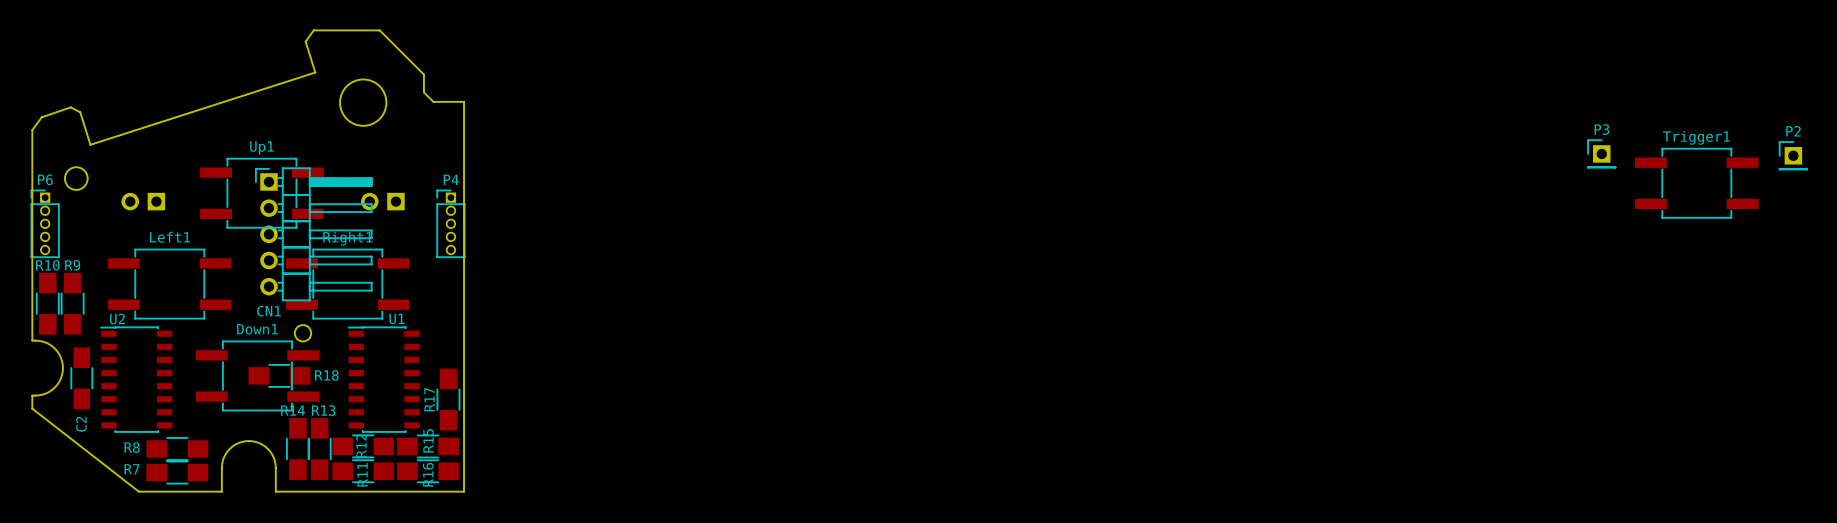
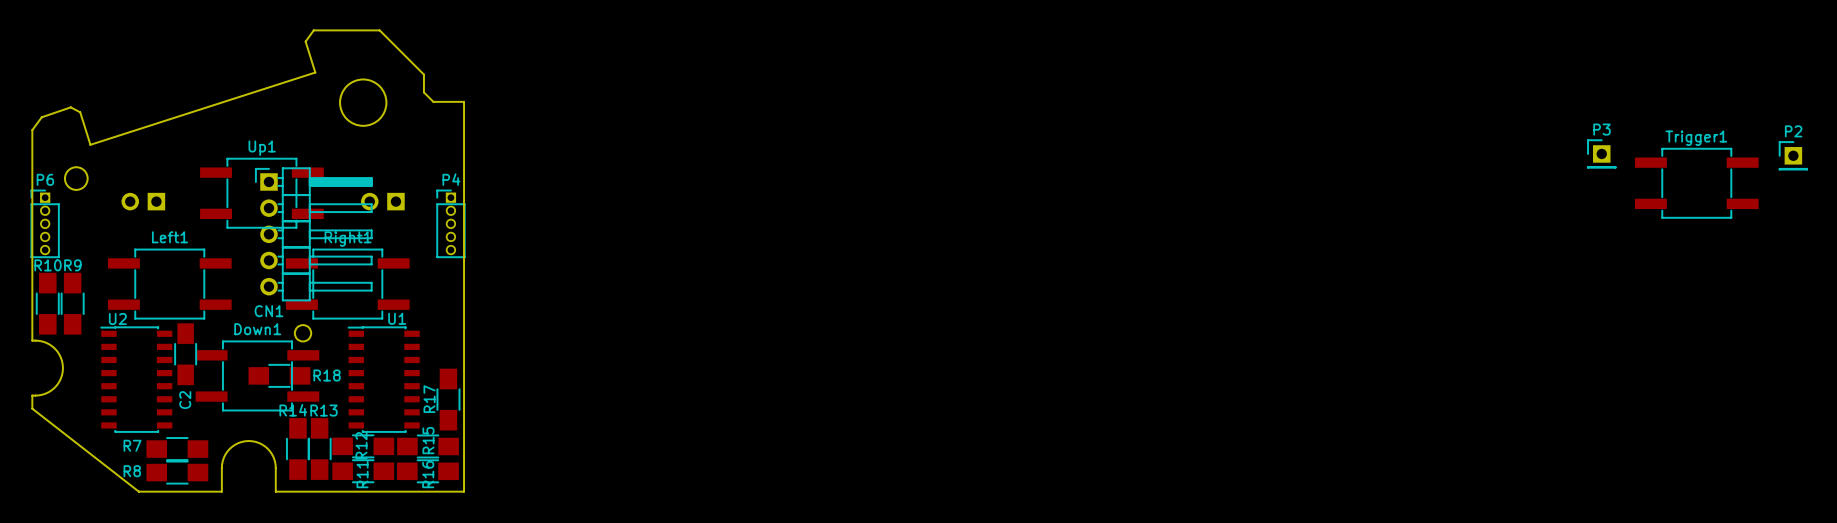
C2 position: (81, 378) -> (185, 354)
R8 name: R8 (132, 447) -> R7 (132, 445)
R7 name: R7 (132, 469) -> R8 (132, 471)

